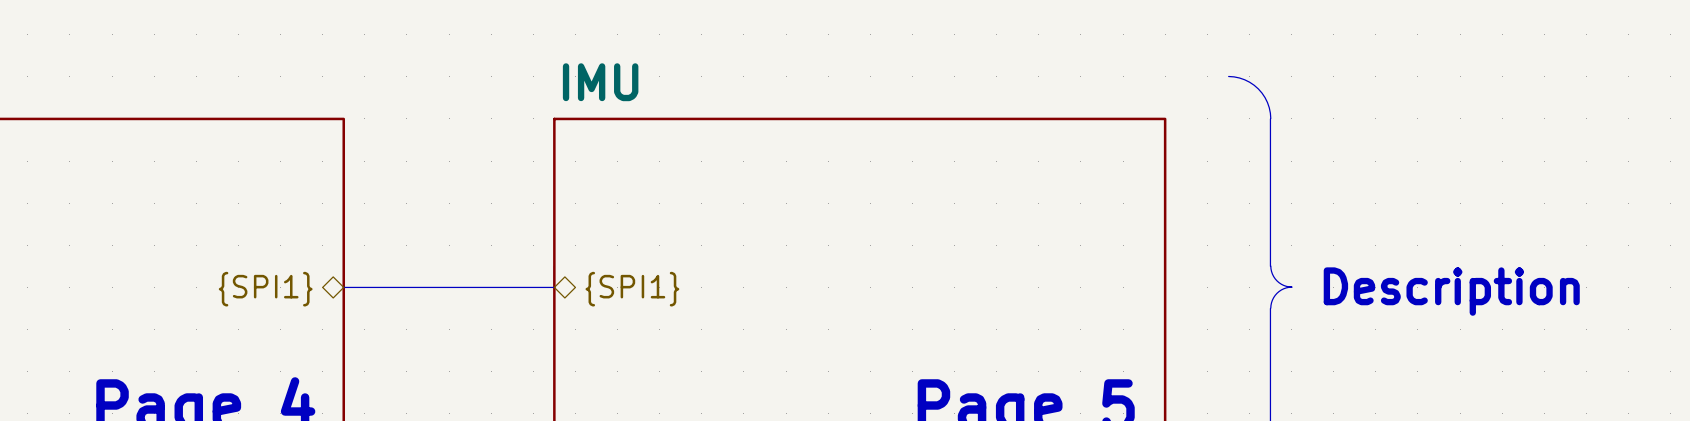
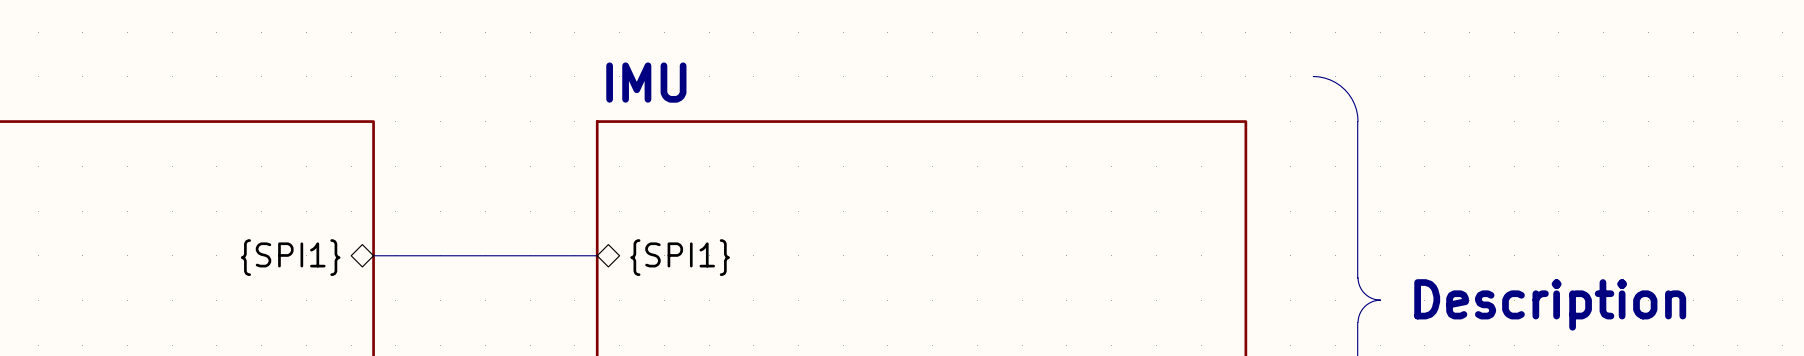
sheet pin: none -> {SPI1} (290, 257)
sheet pin: none -> {SPI1} (680, 257)
bus: (343, 287) (554, 287) -> (373, 255) (597, 255)
hierarchical label: {SPI1} (265, 289) -> none
hierarchical label: {SPI1} (632, 289) -> none

